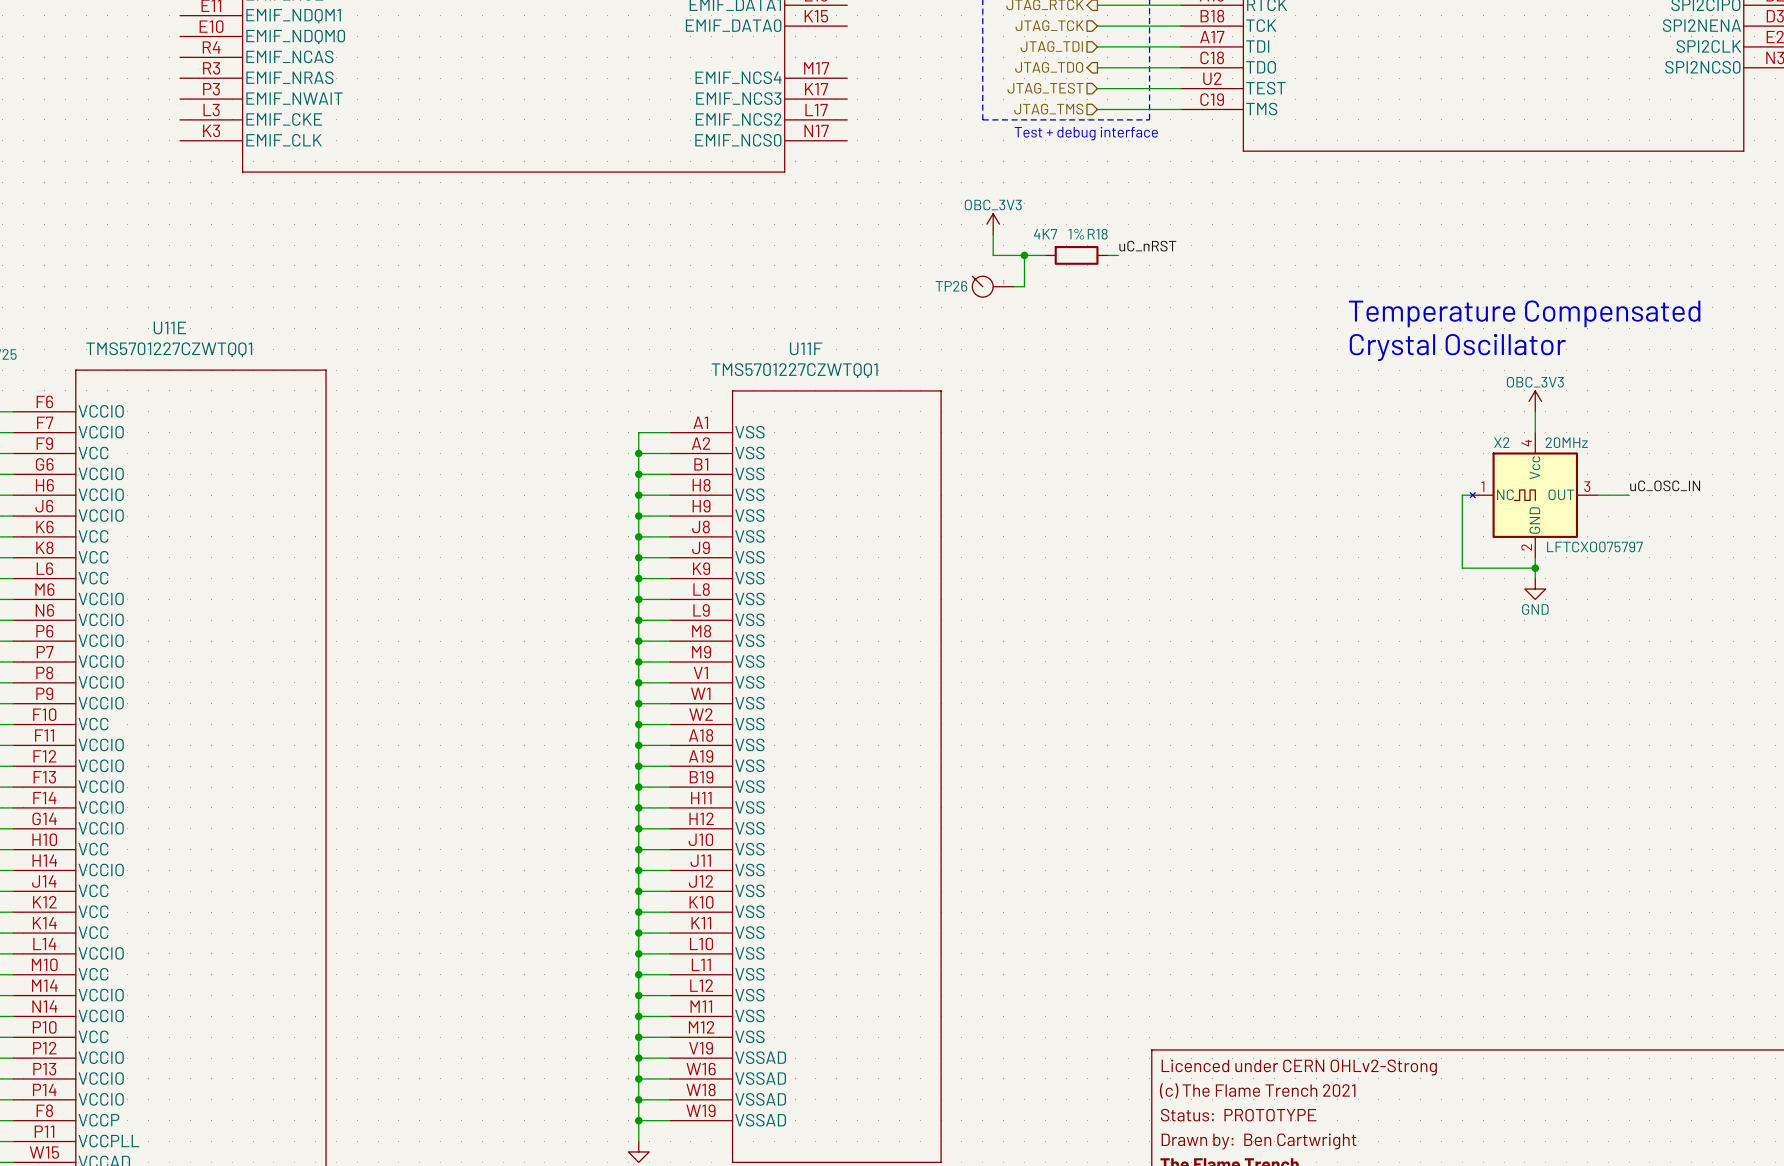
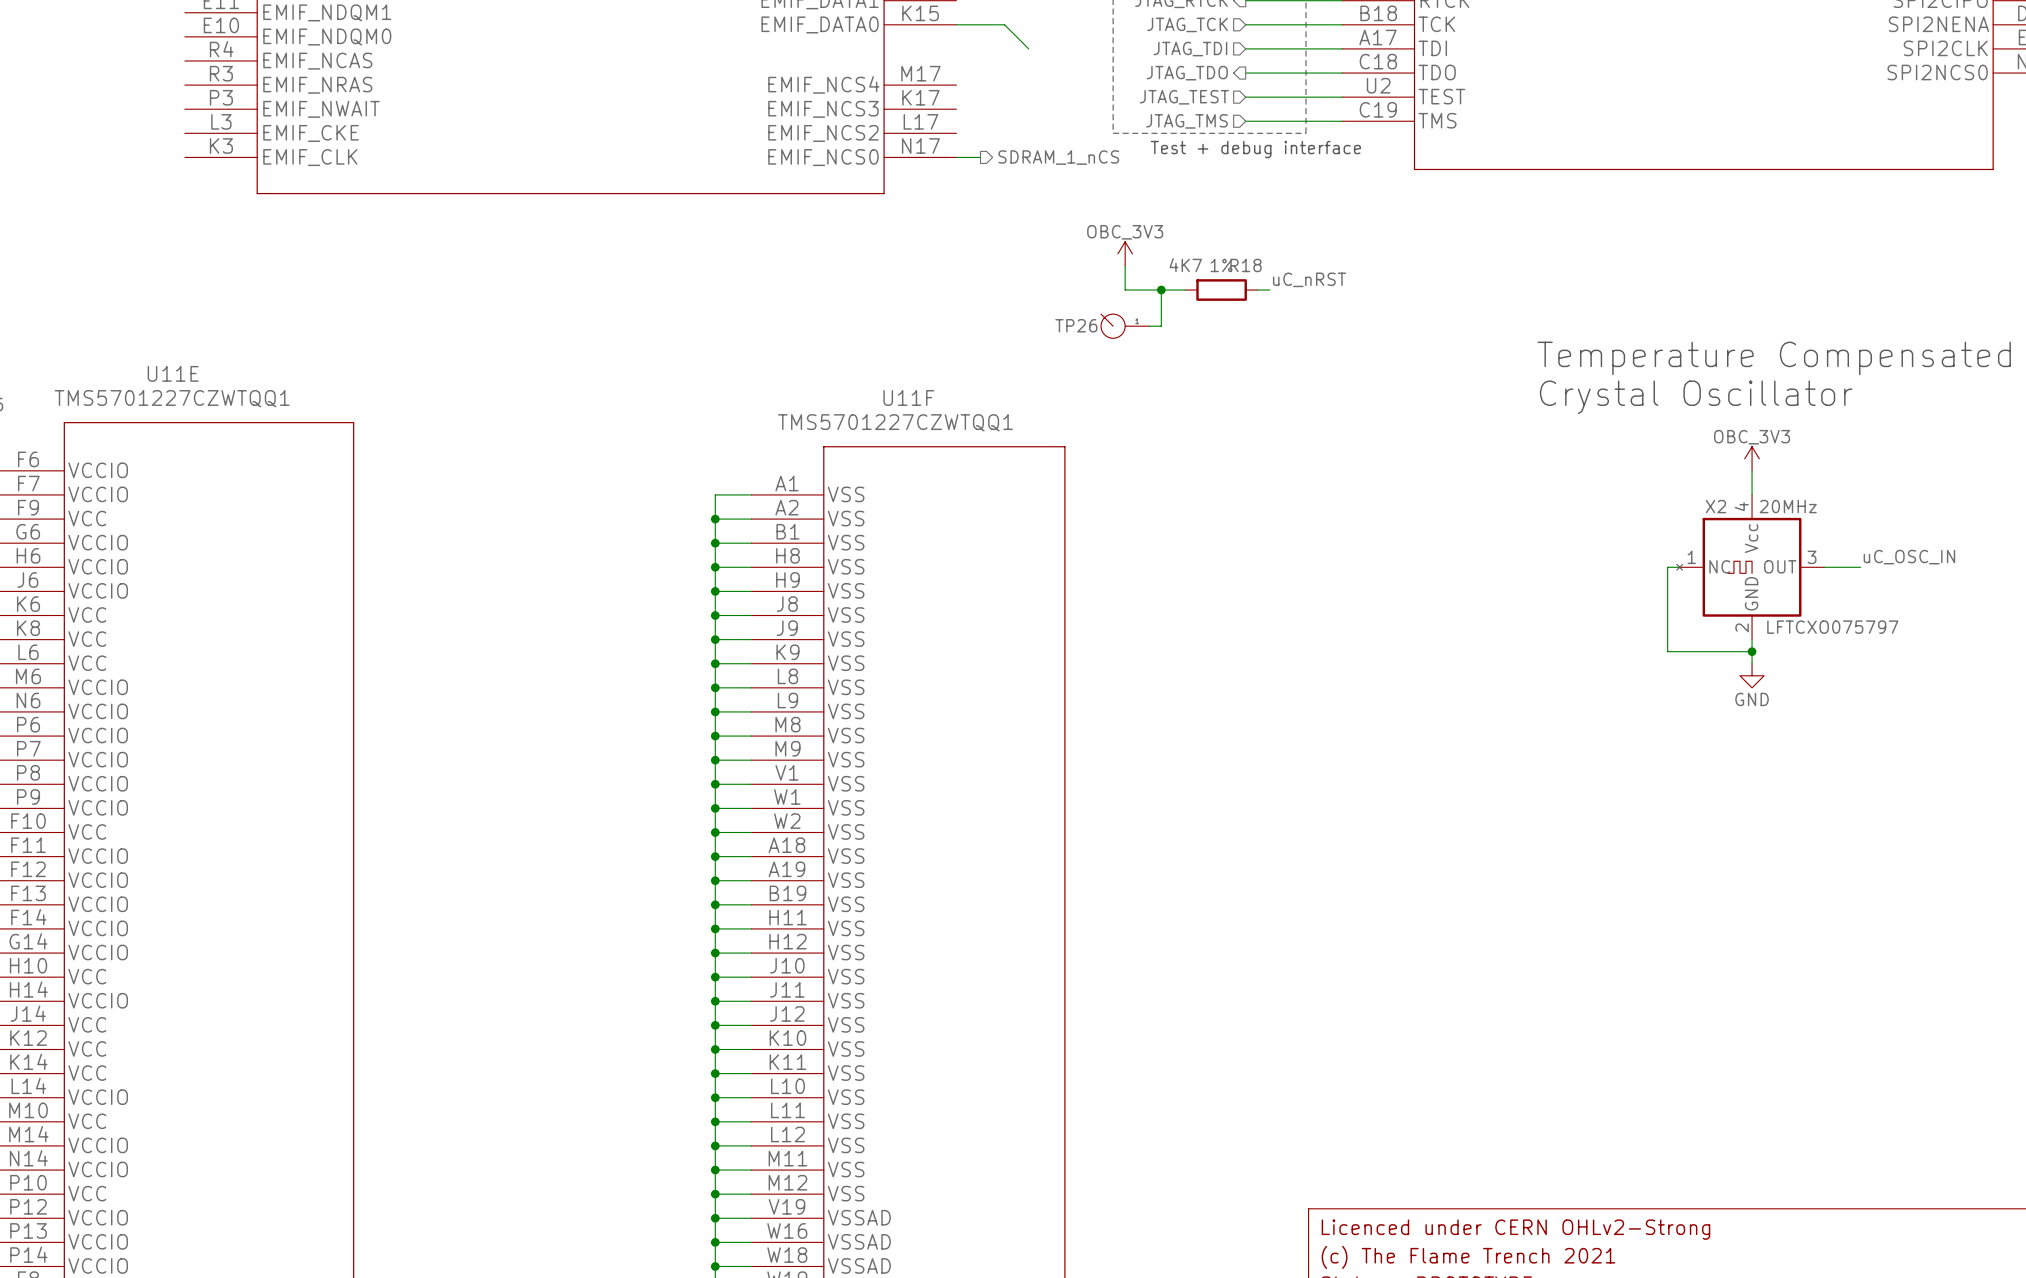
wire: none -> (956, 24) (1004, 24) (1028, 48)
wire: none -> (956, 157) (980, 157)
hierarchical label: none -> SDRAM_1_nCS (1058, 157)

